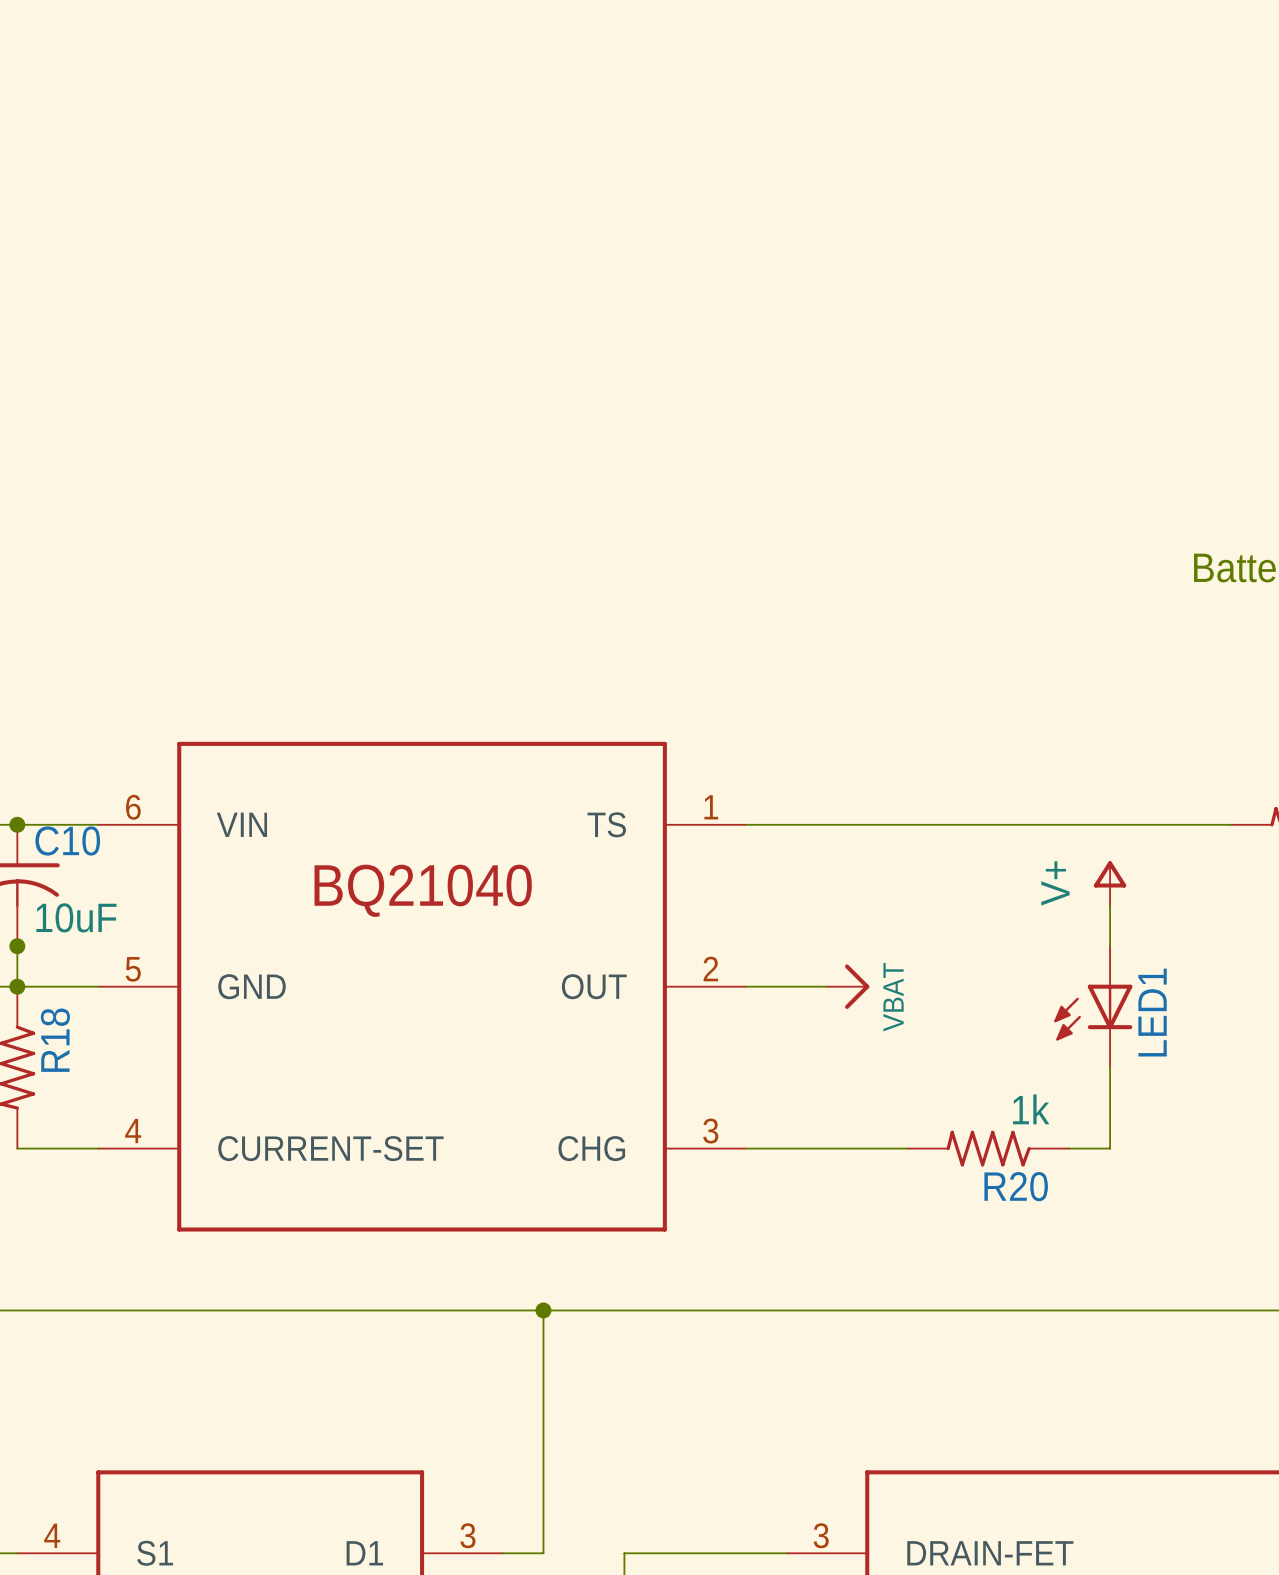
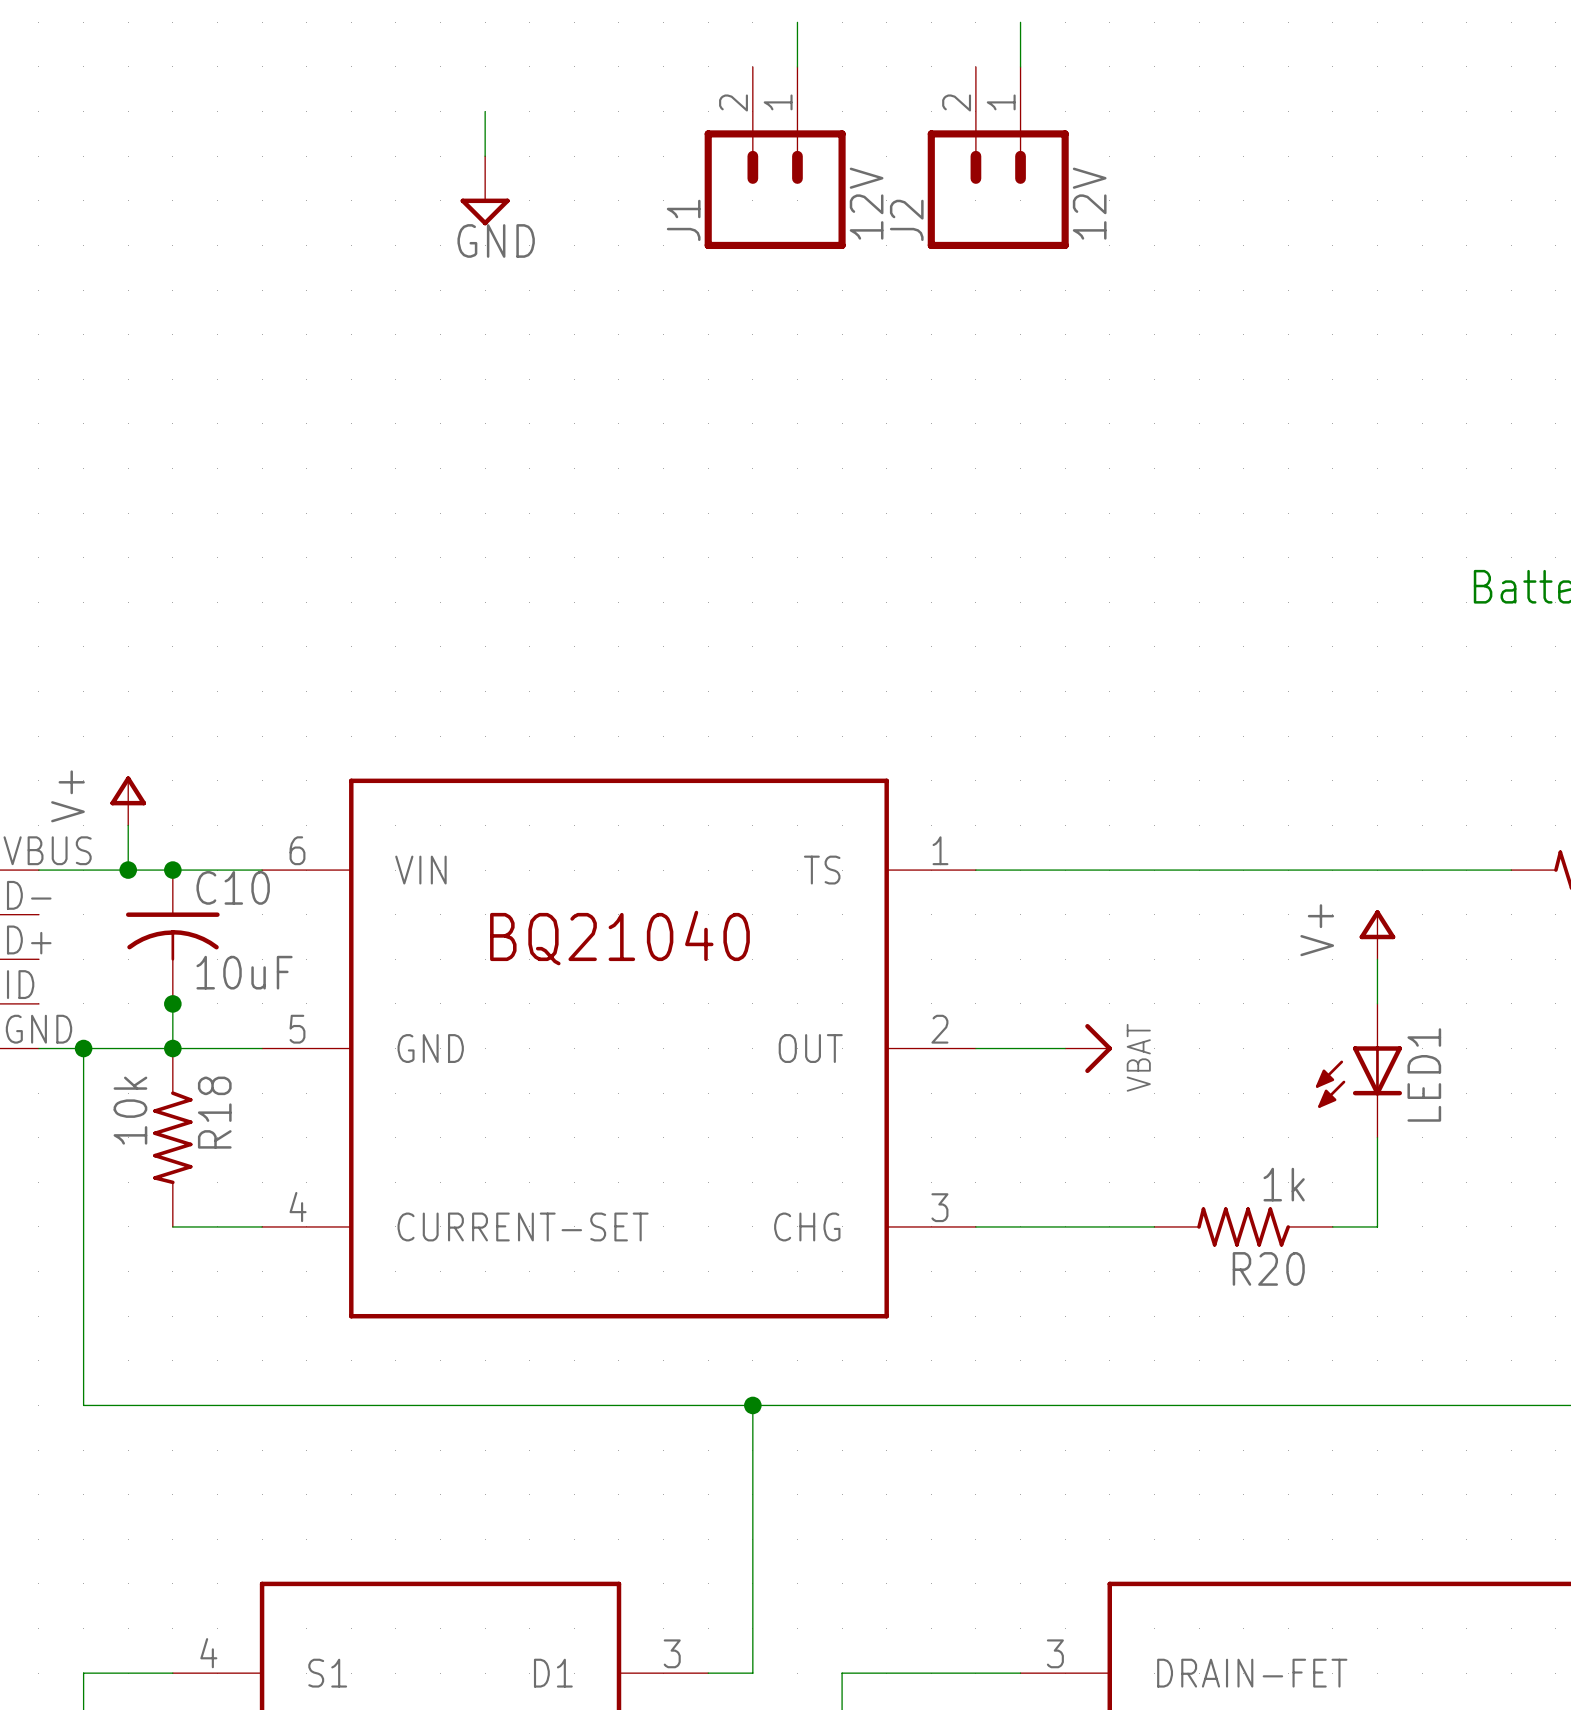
wire: none -> (797, 22) (797, 66)
wire: none -> (1020, 22) (1020, 66)
wire: none -> (485, 111) (485, 156)
J1: none -> 12V (775, 157)
J2: none -> 12V (998, 157)
power symbol: none -> GND (485, 190)

